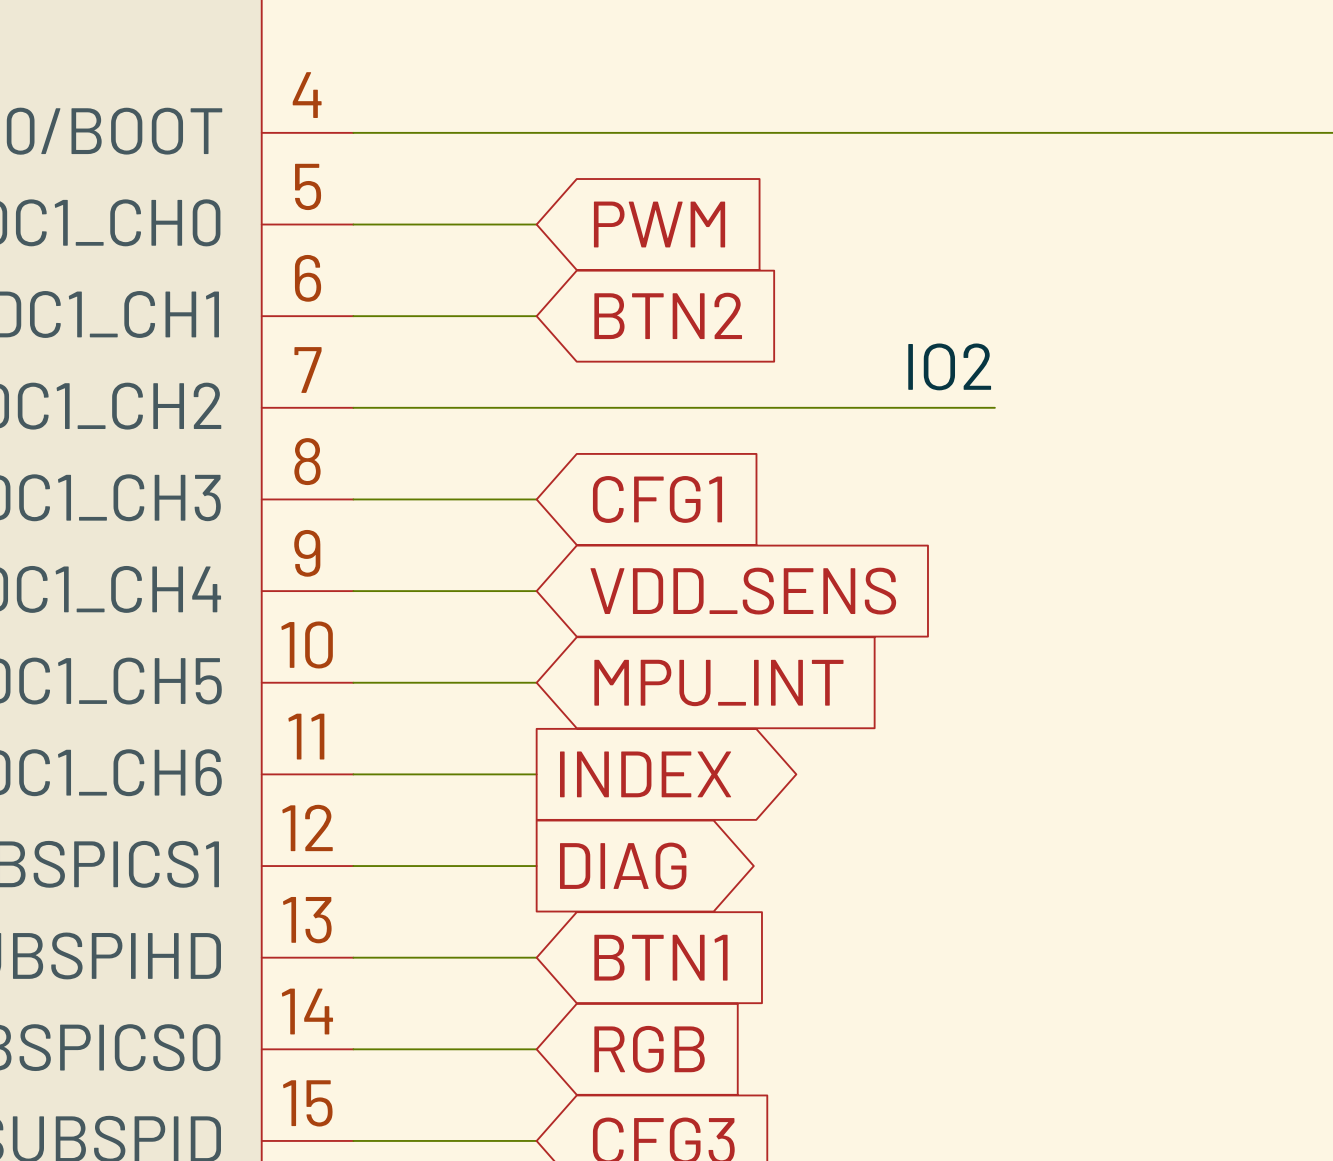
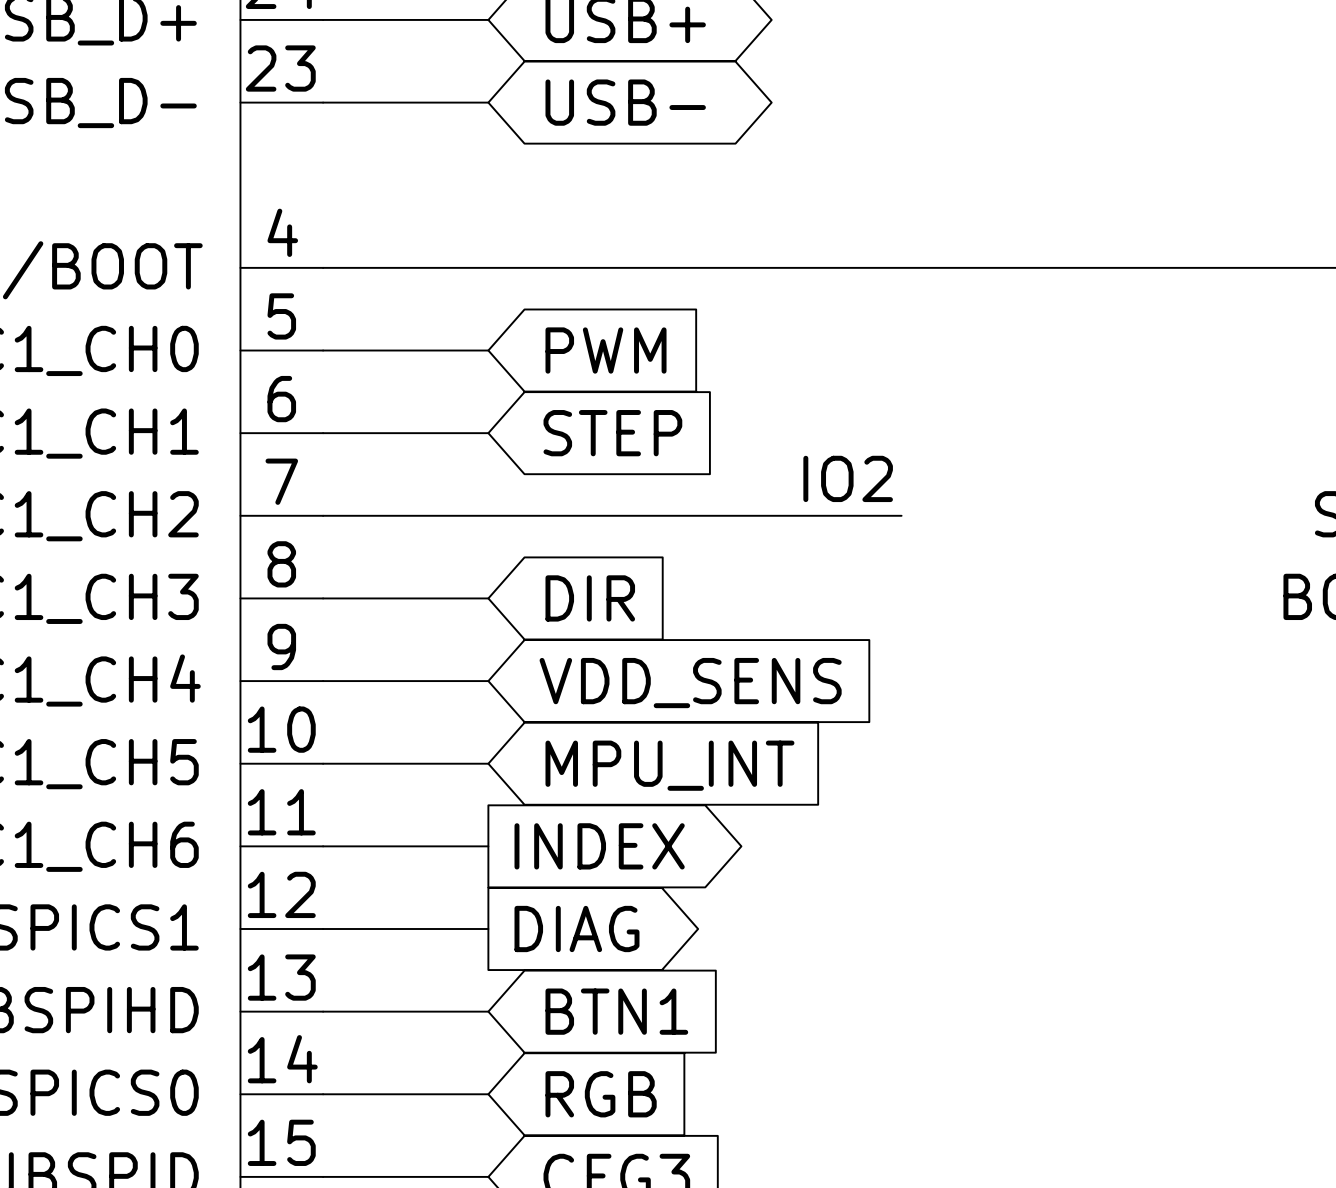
global label: BTN2 (668, 315) -> STEP (612, 433)
global label: CFG1 (657, 499) -> DIR (590, 598)

